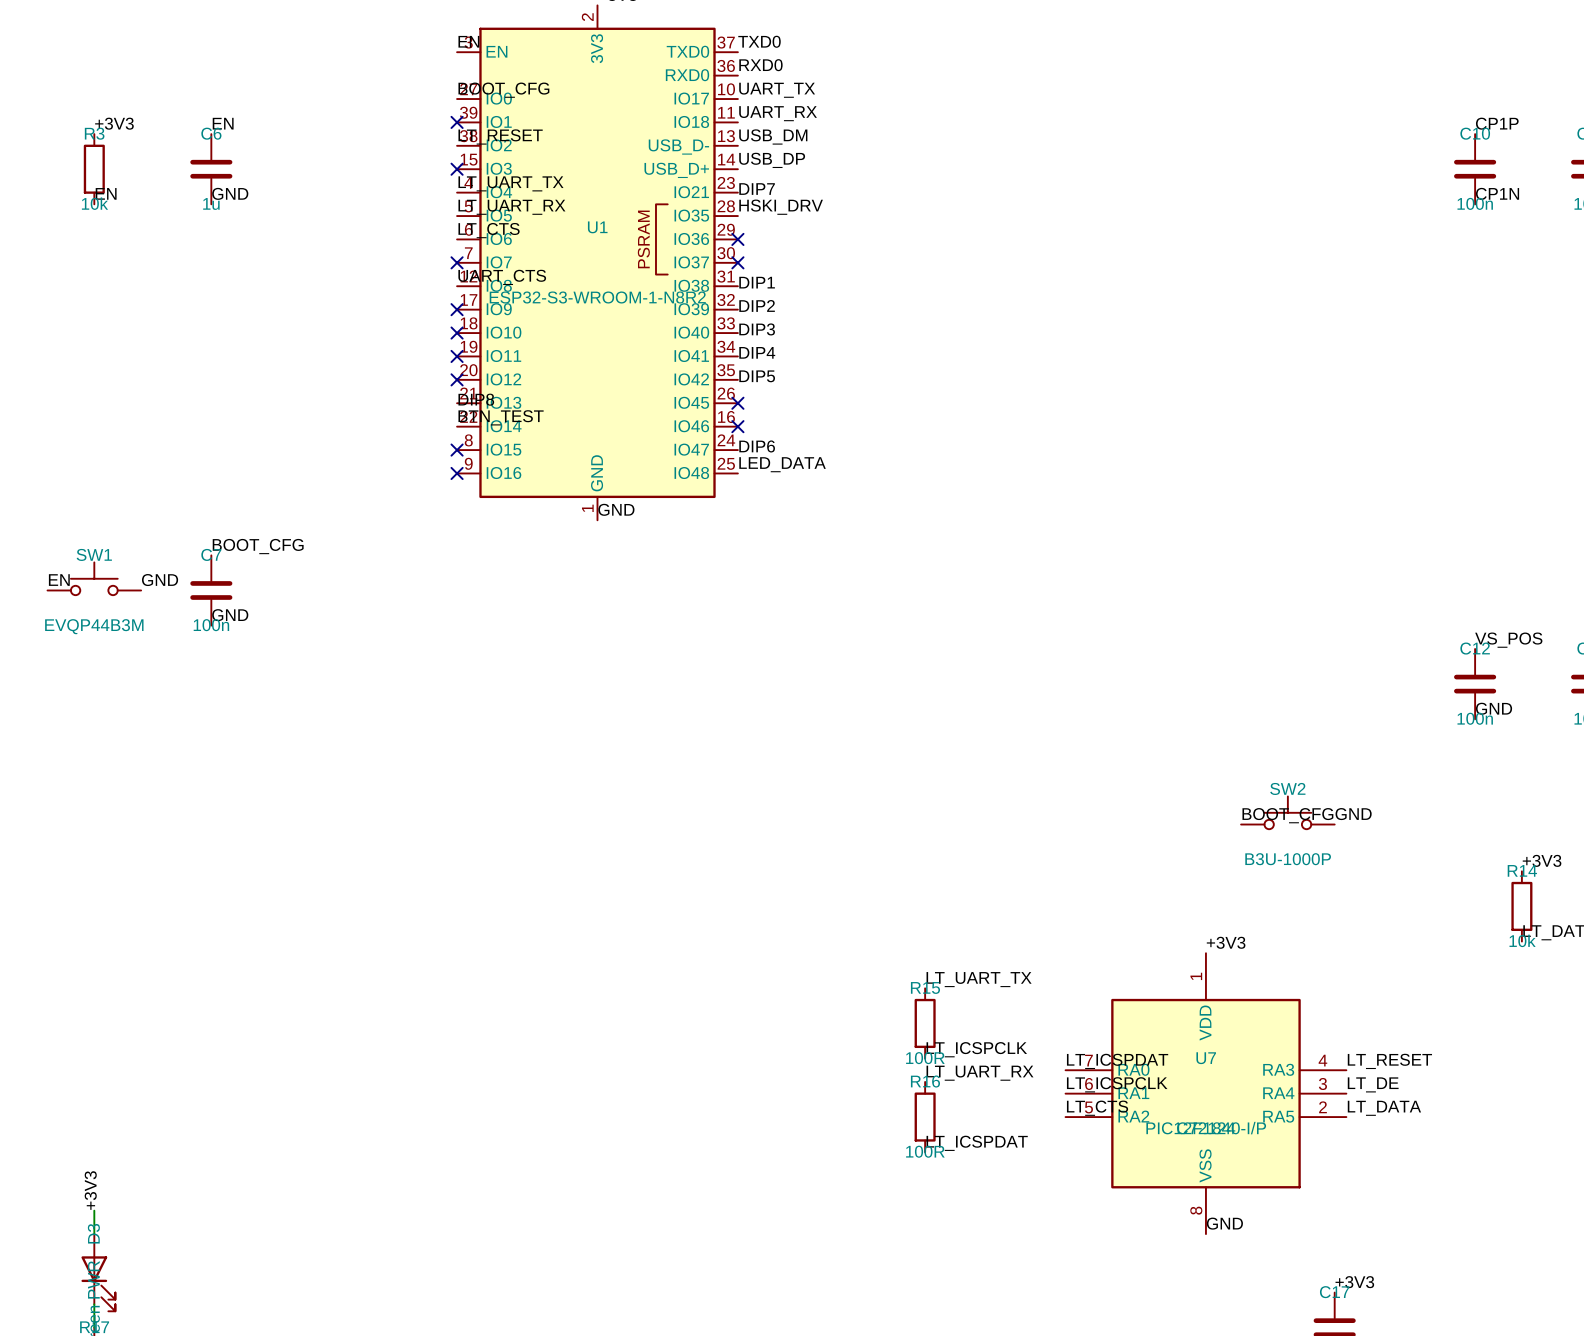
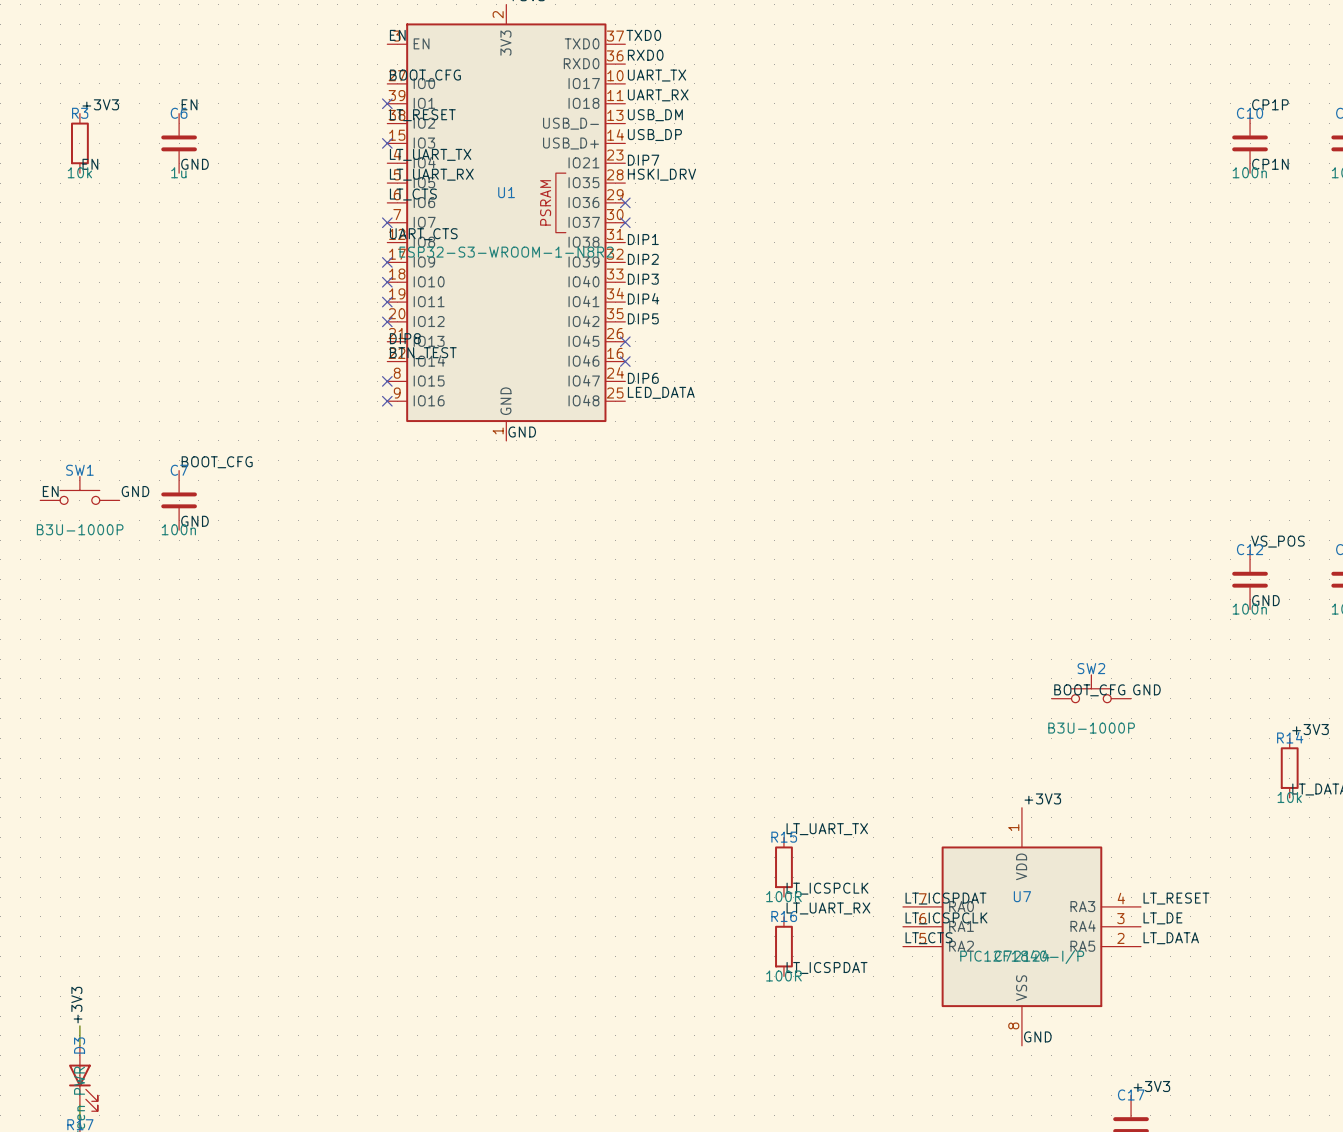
SW1 value: EVQP44B3M (94, 626) -> B3U-1000P (80, 529)

